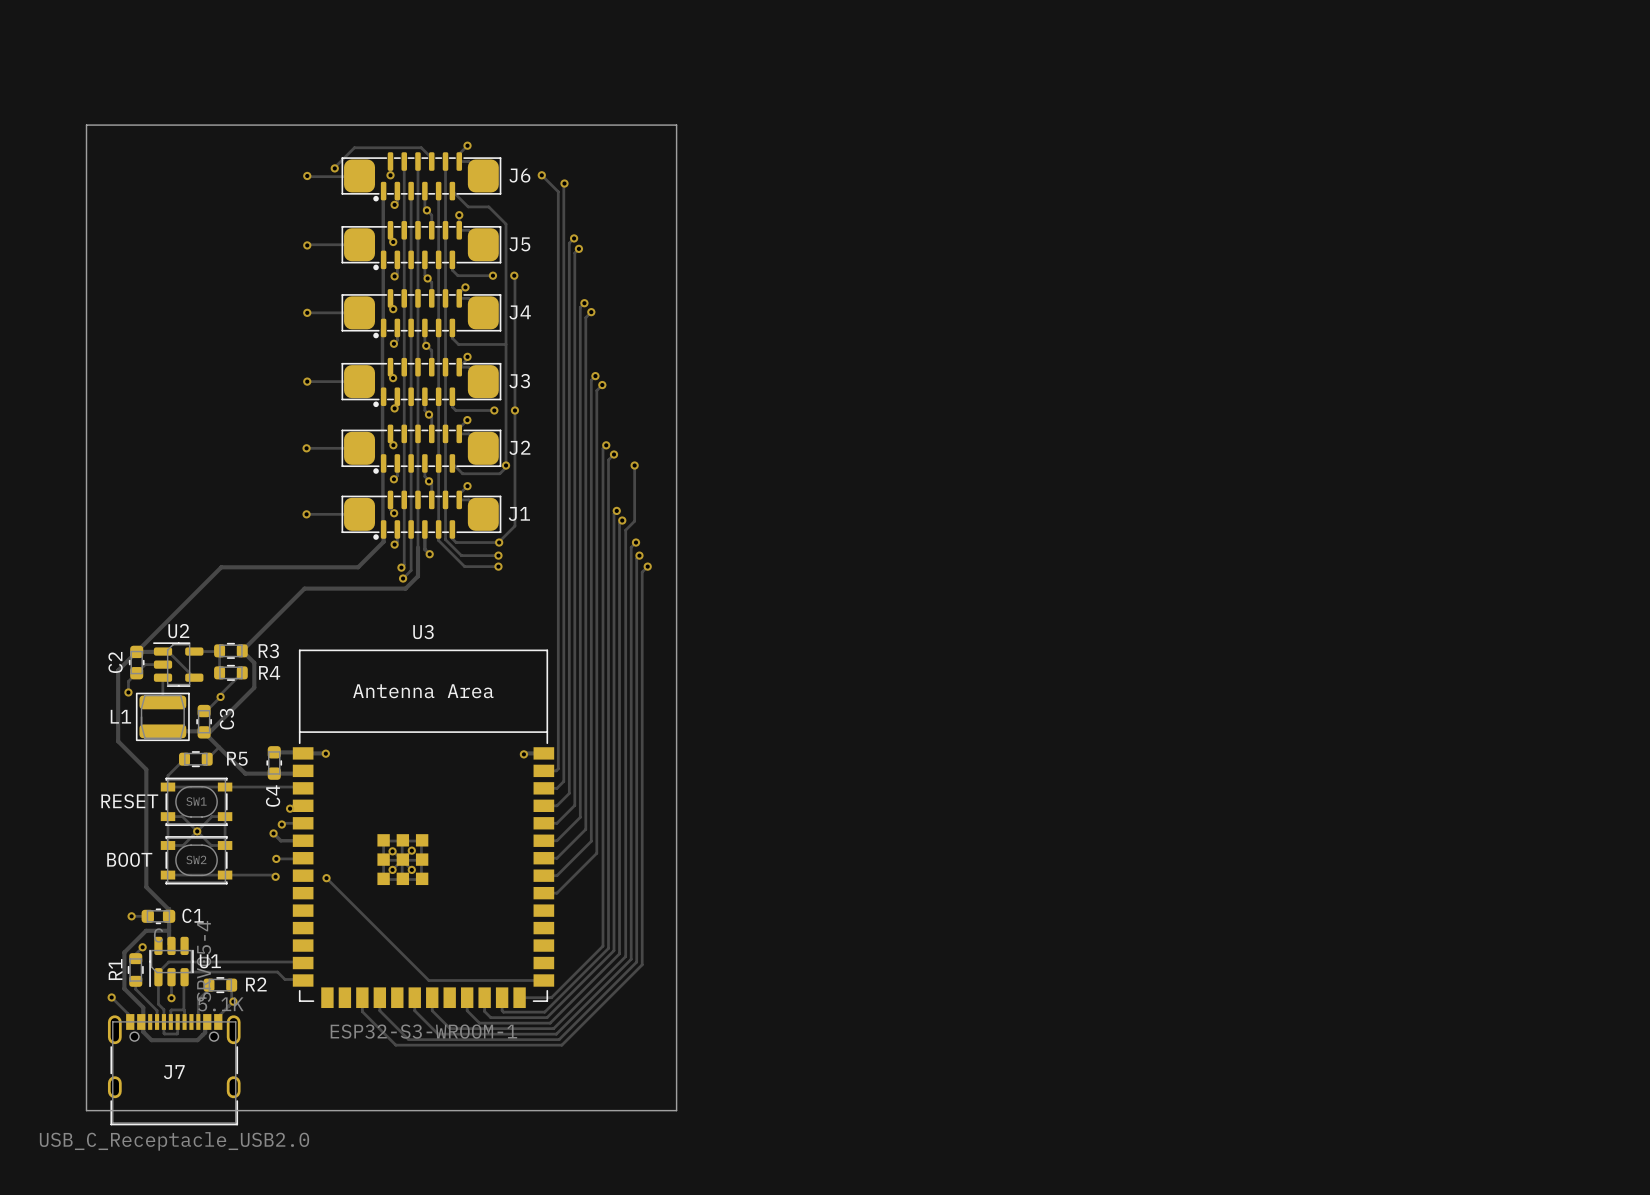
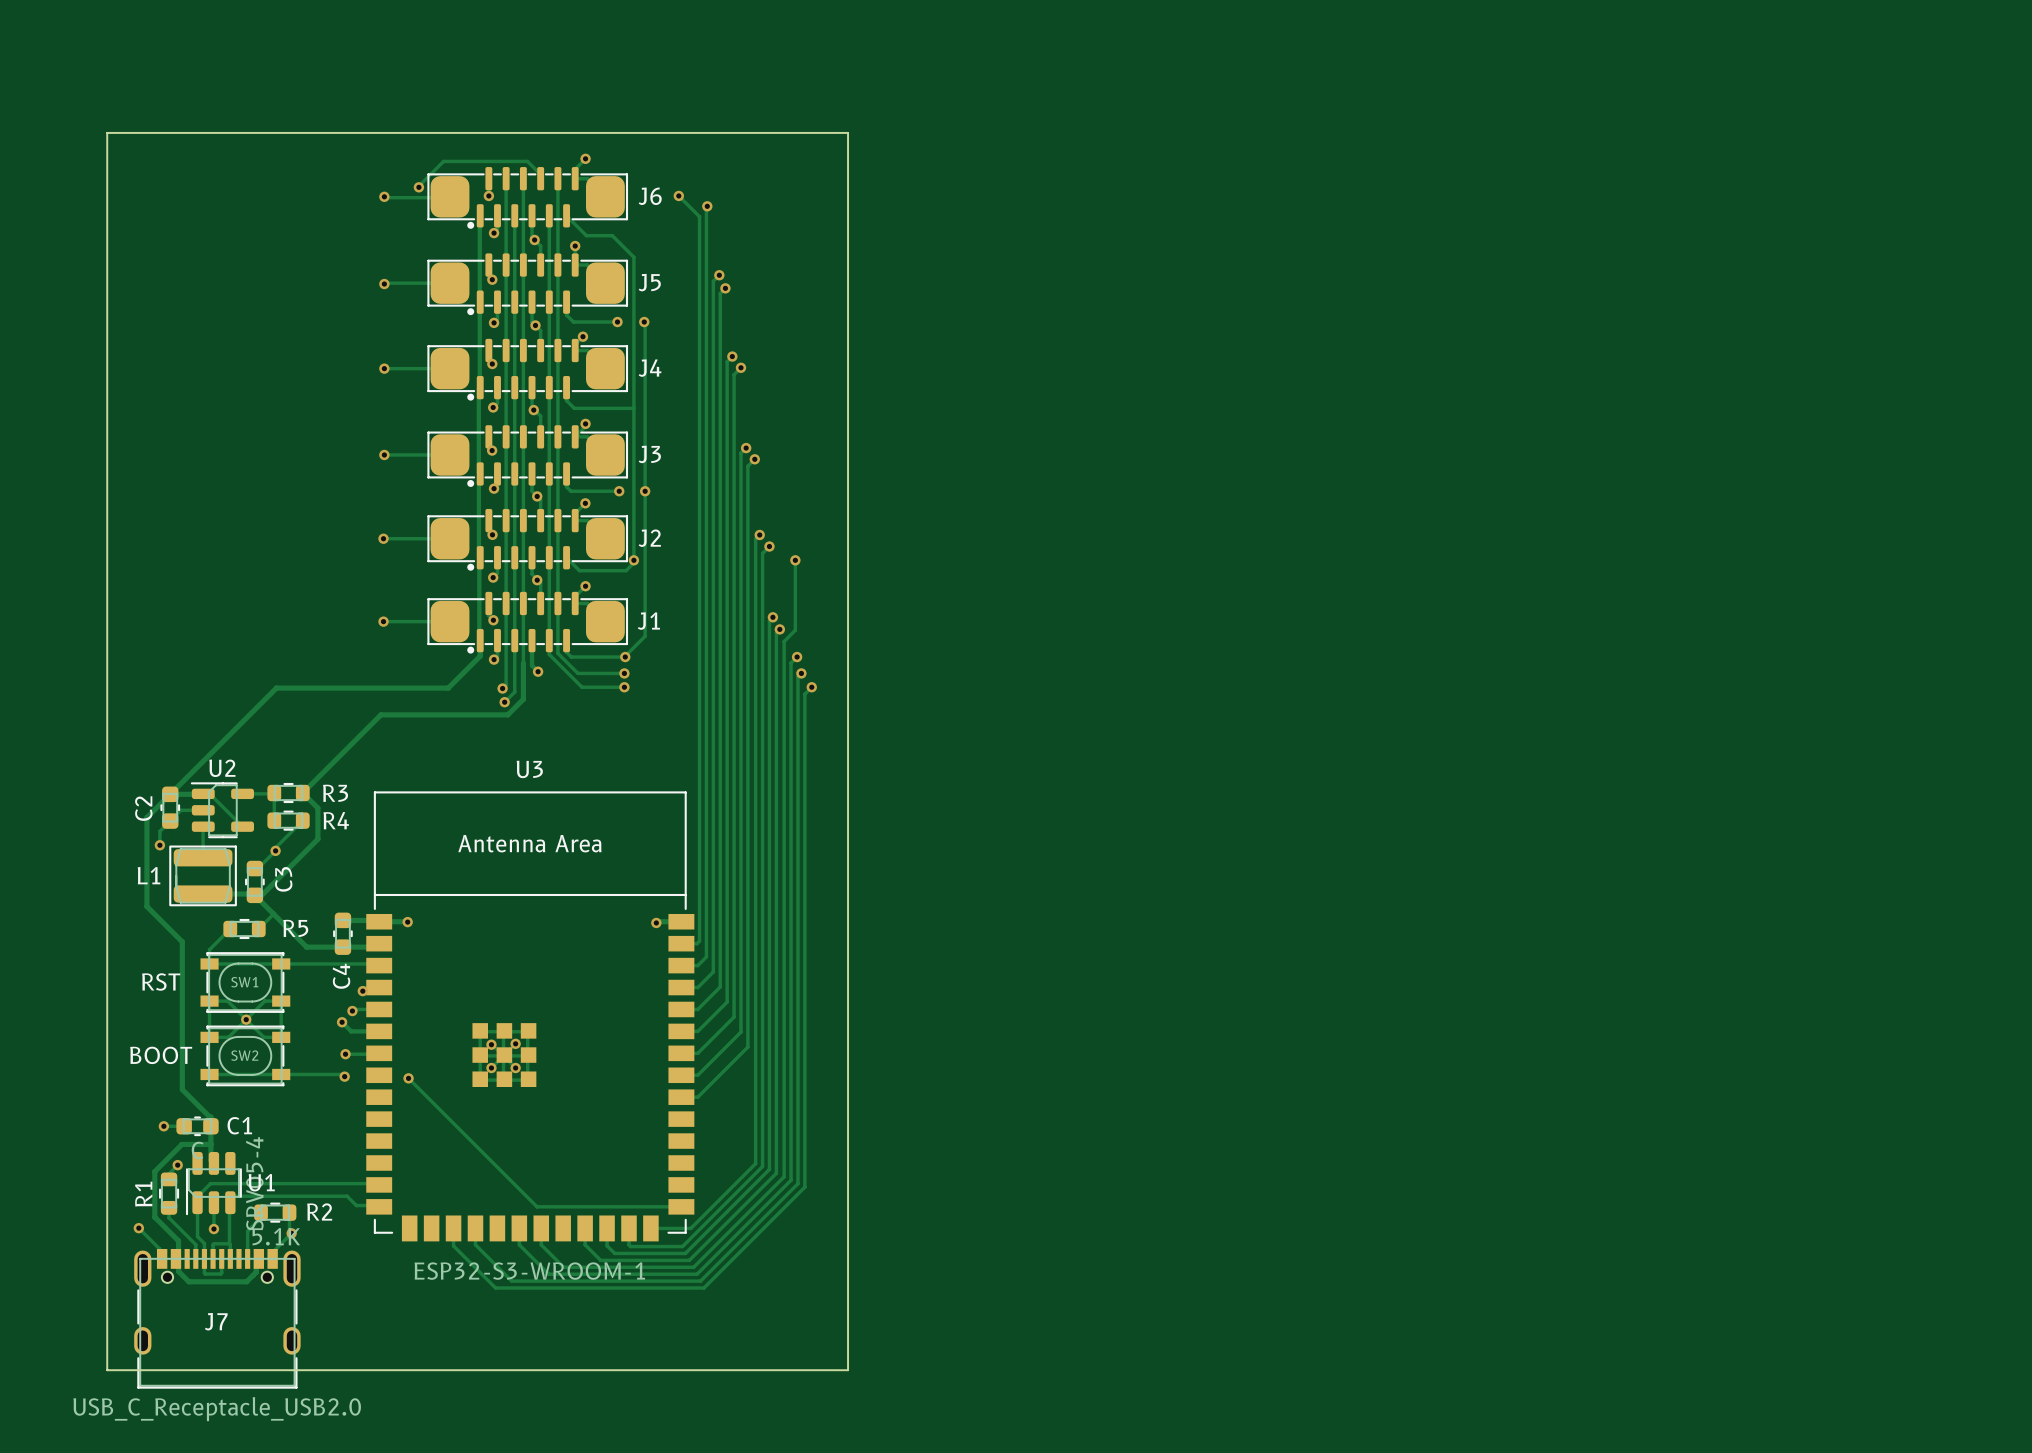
SW1 value: RESET (129, 801) -> RST (161, 982)

